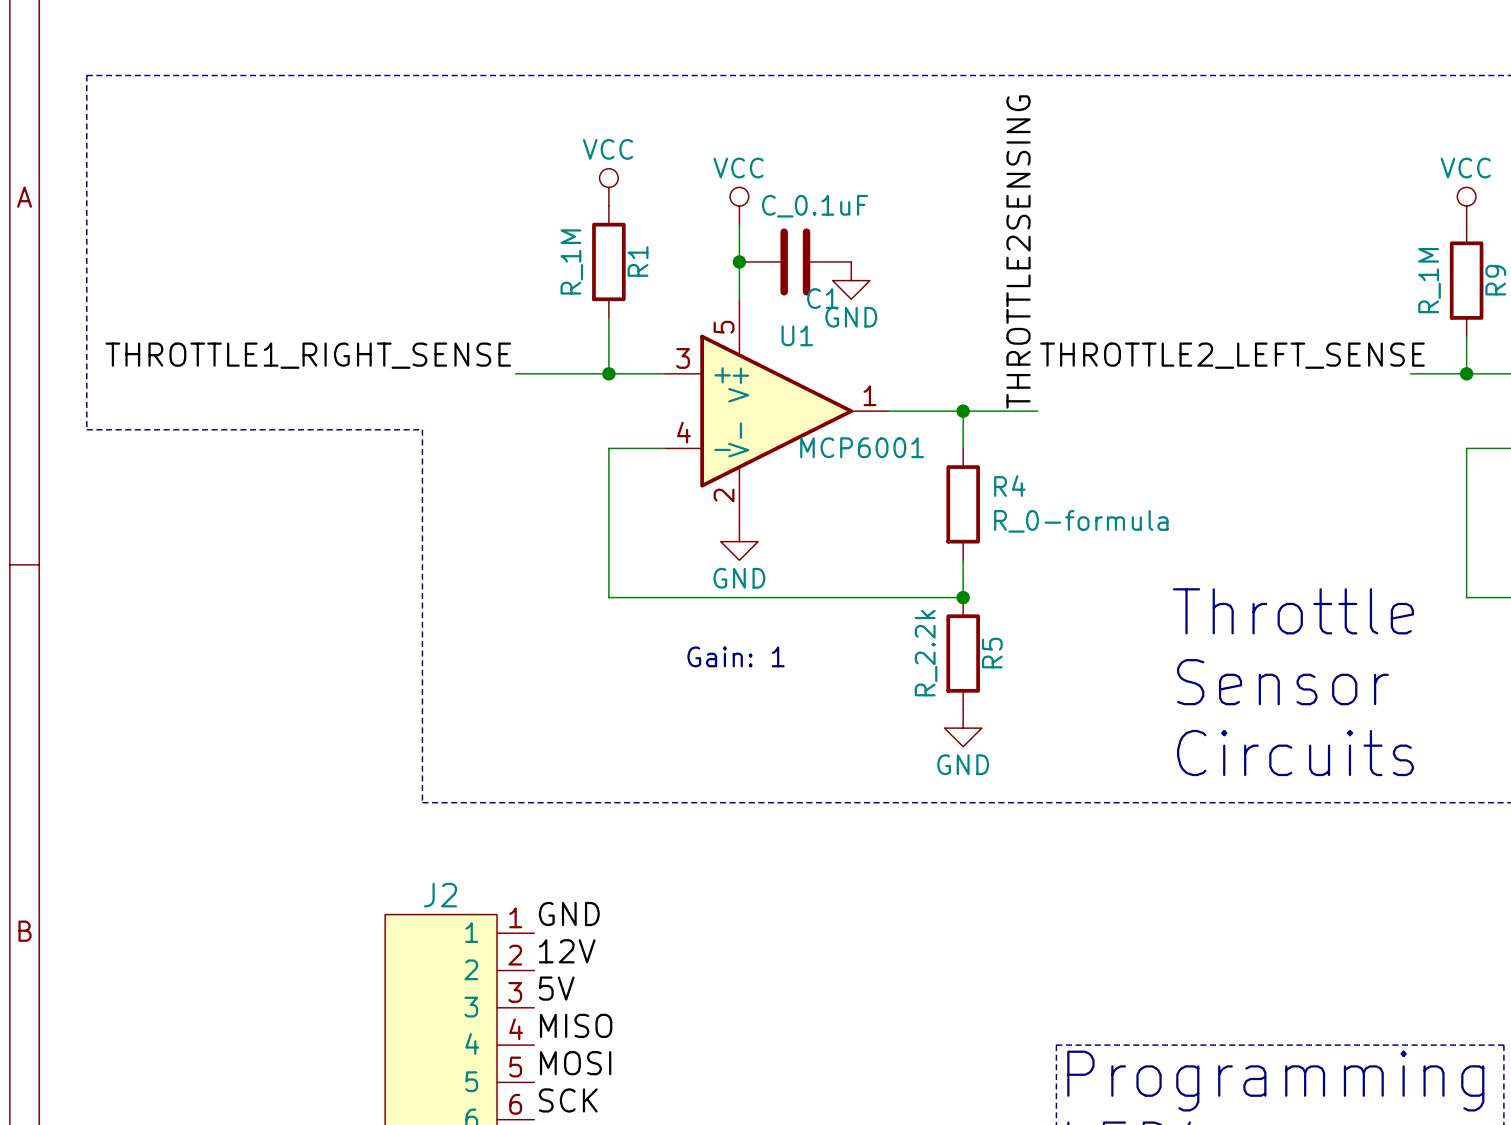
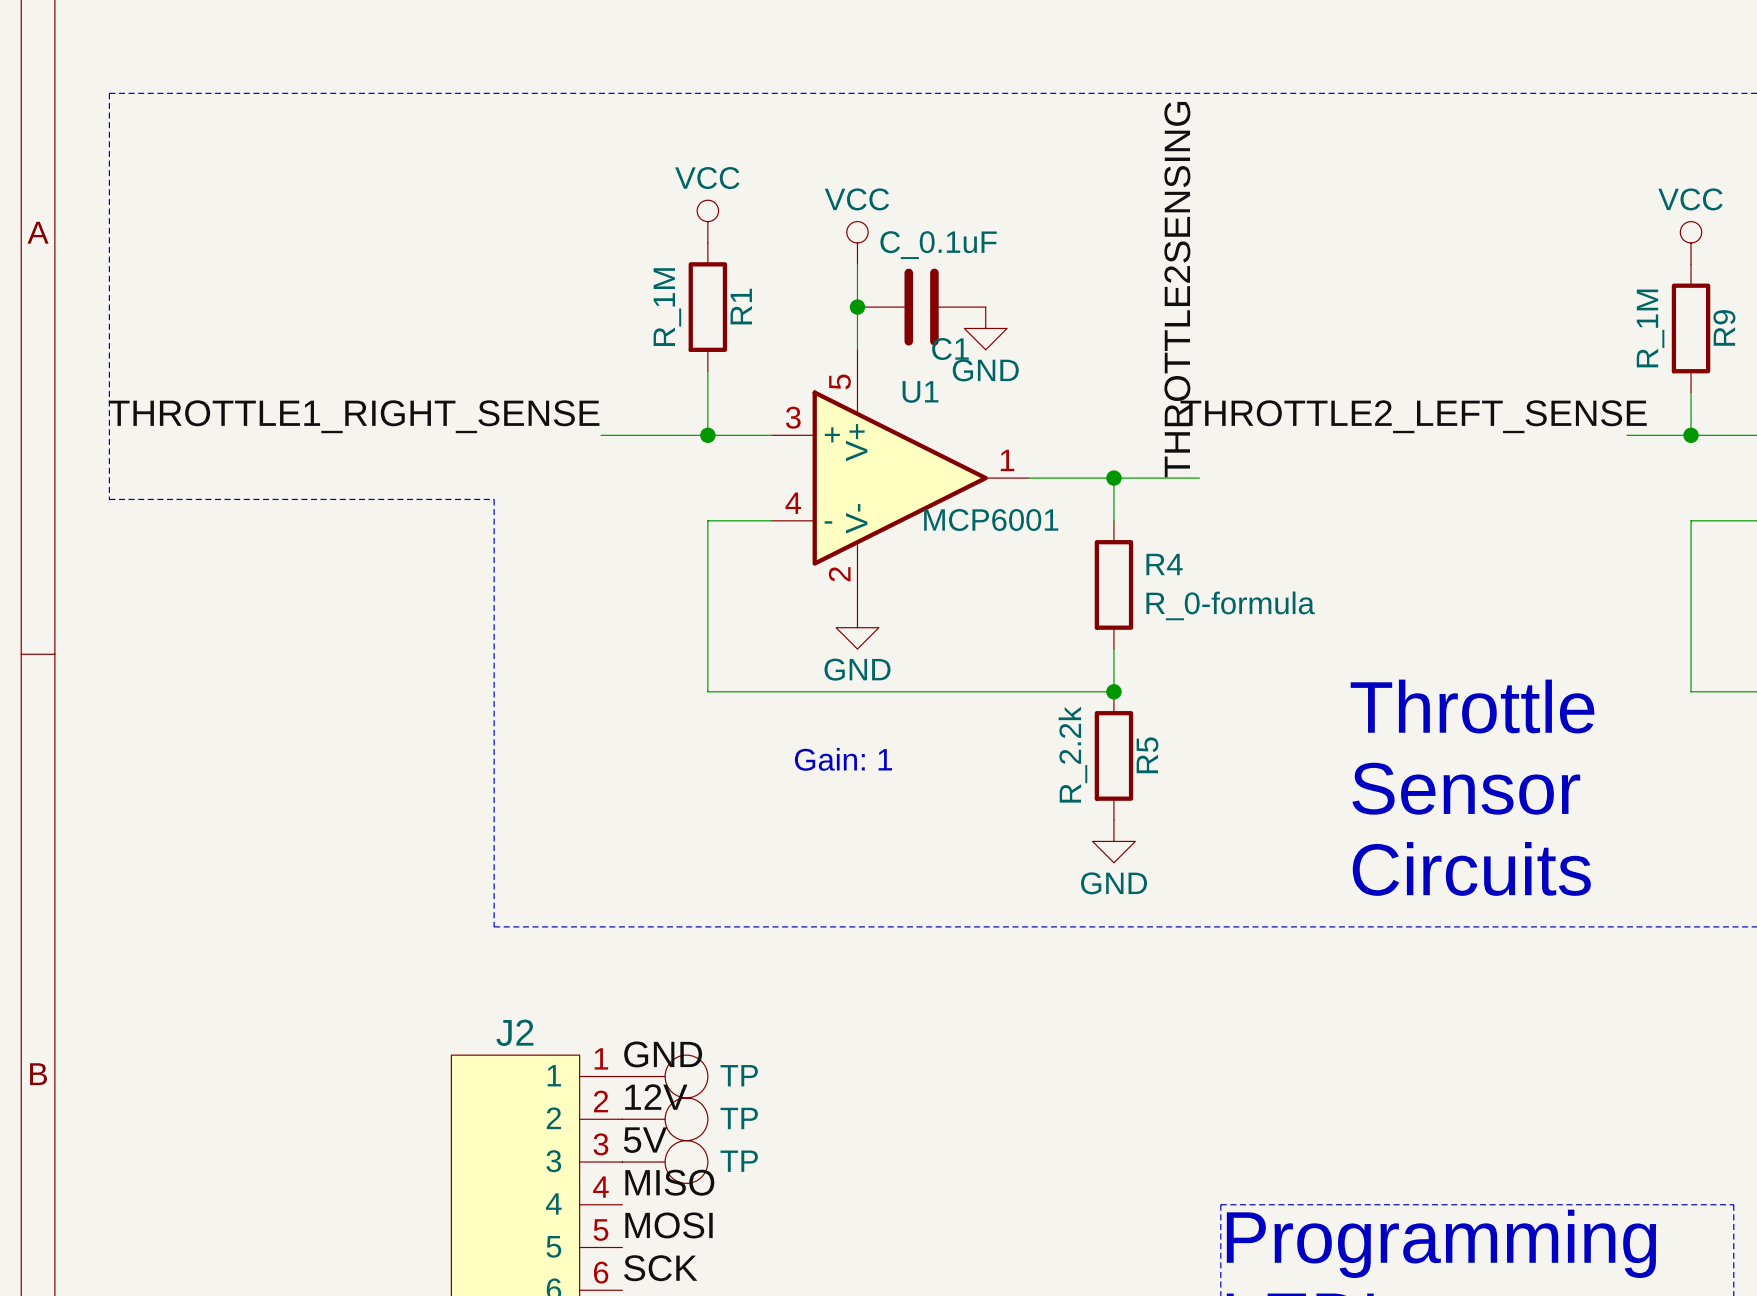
TP: none -> (665, 1076)
TP: none -> (665, 1119)
TP: none -> (665, 1162)

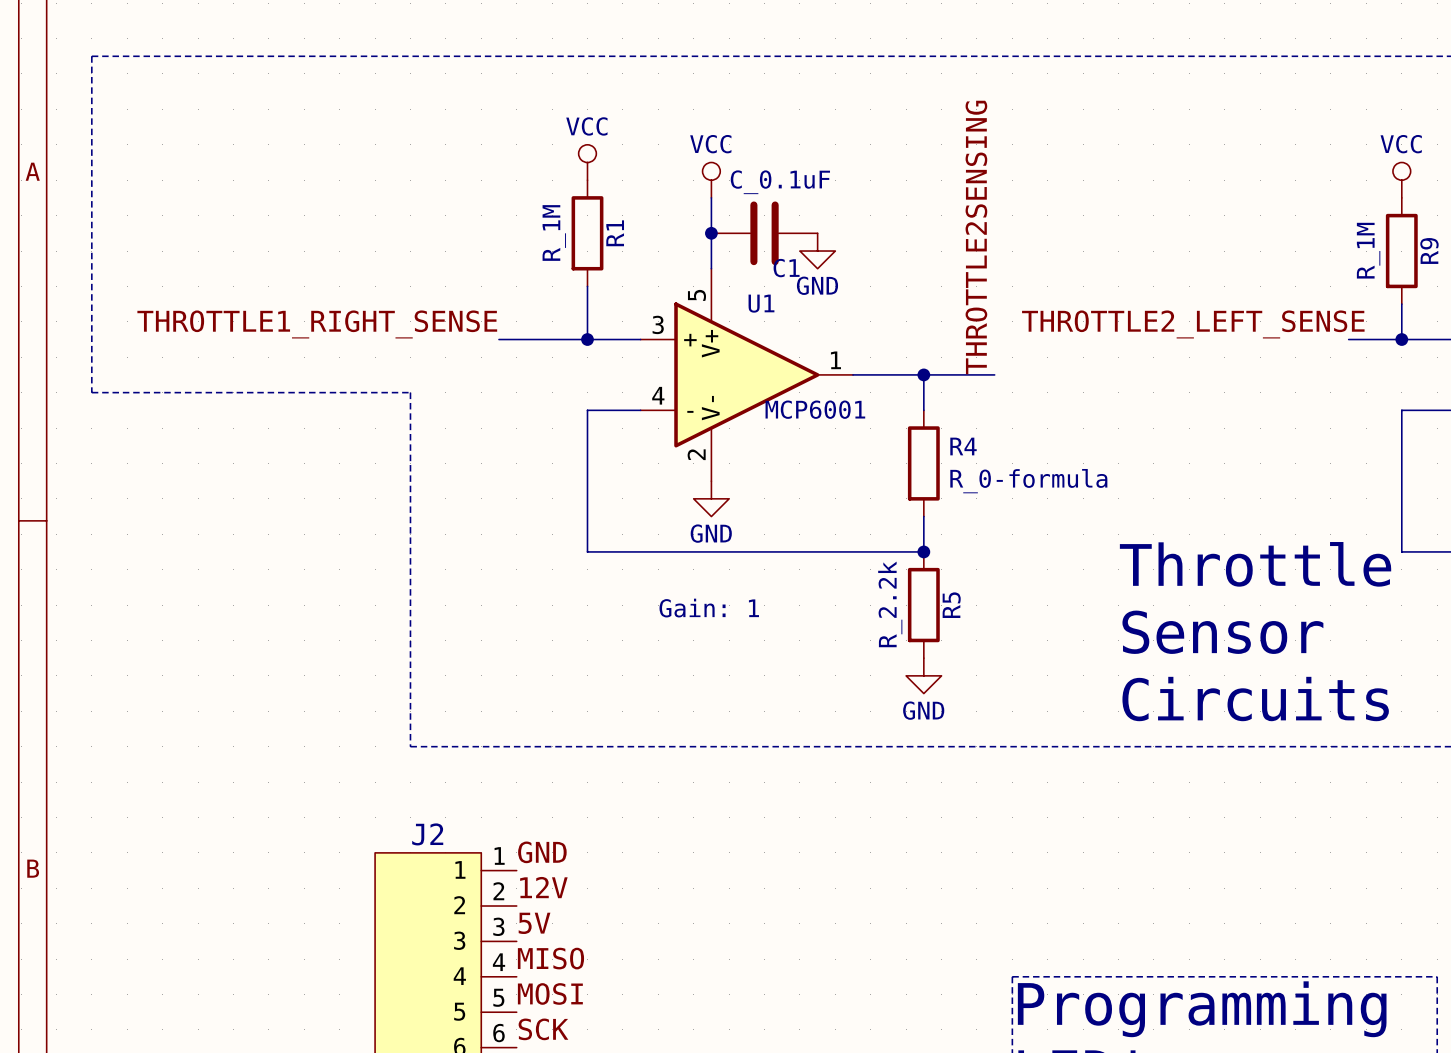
TP: (665, 1076) -> none
TP: (665, 1119) -> none
TP: (665, 1162) -> none

